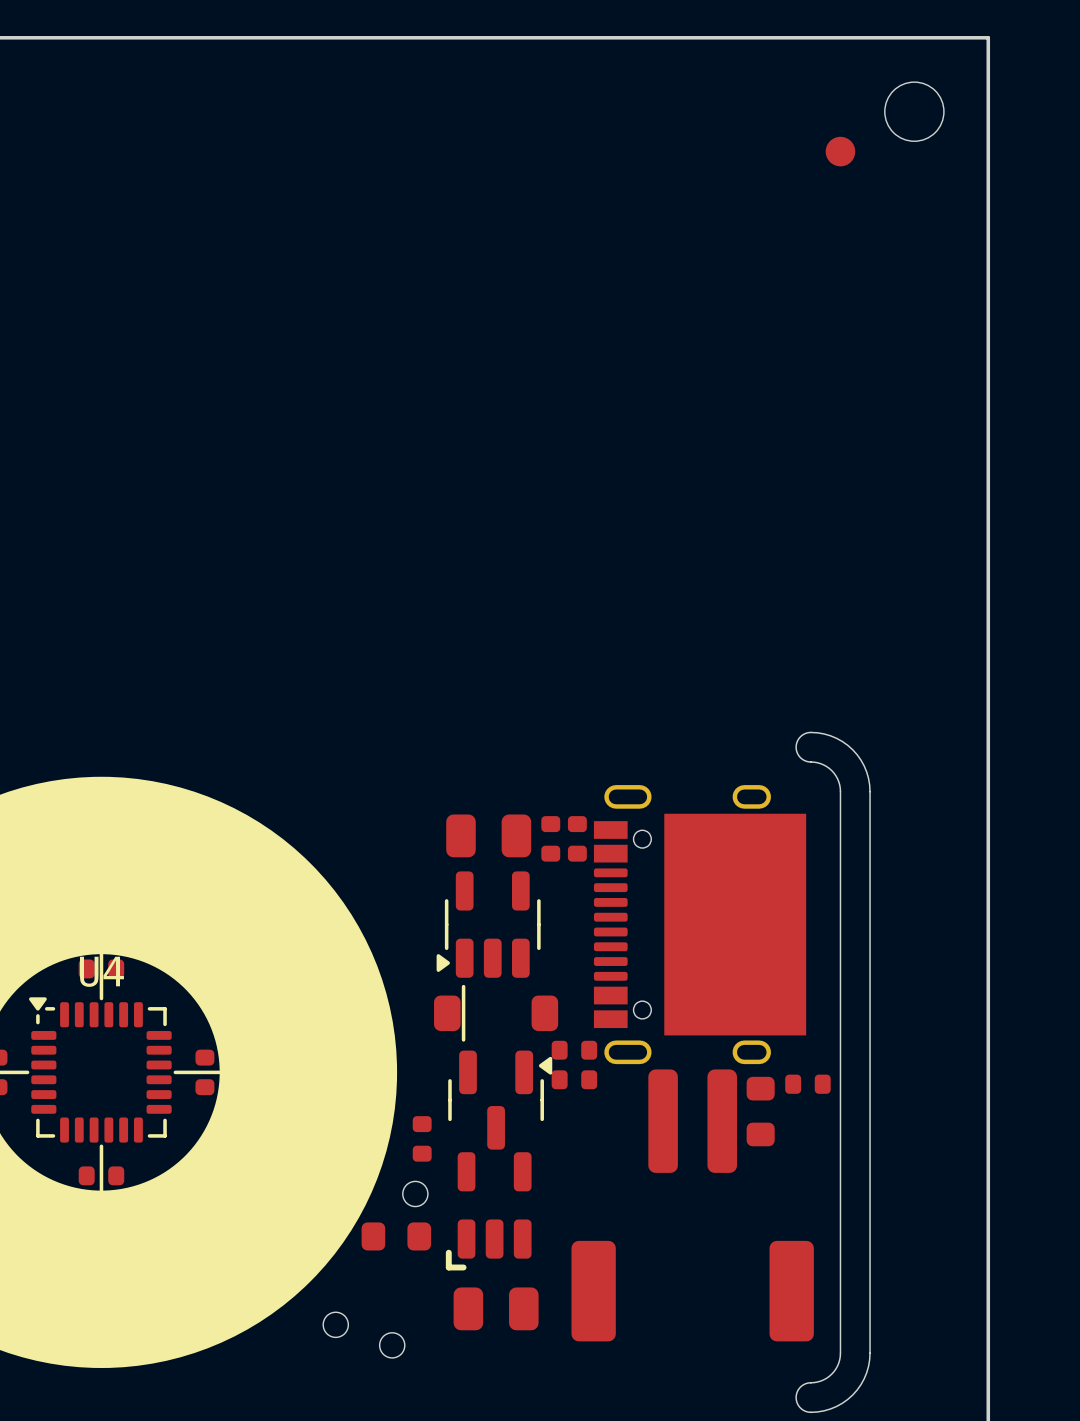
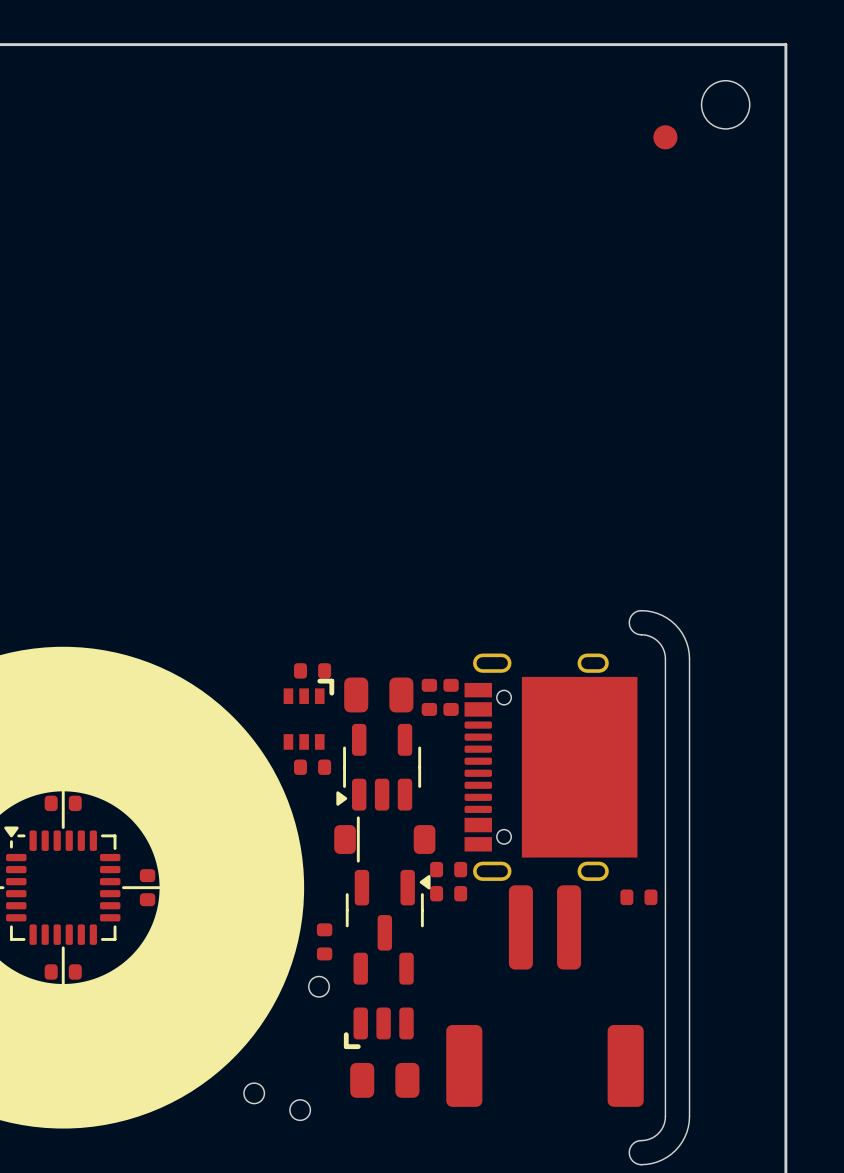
part: none -> (312, 670)
part: none -> (308, 714)
part: none -> (312, 767)
U4 name: U4 (101, 971) -> none
part: (760, 1111) -> none
part: (396, 1236) -> none

